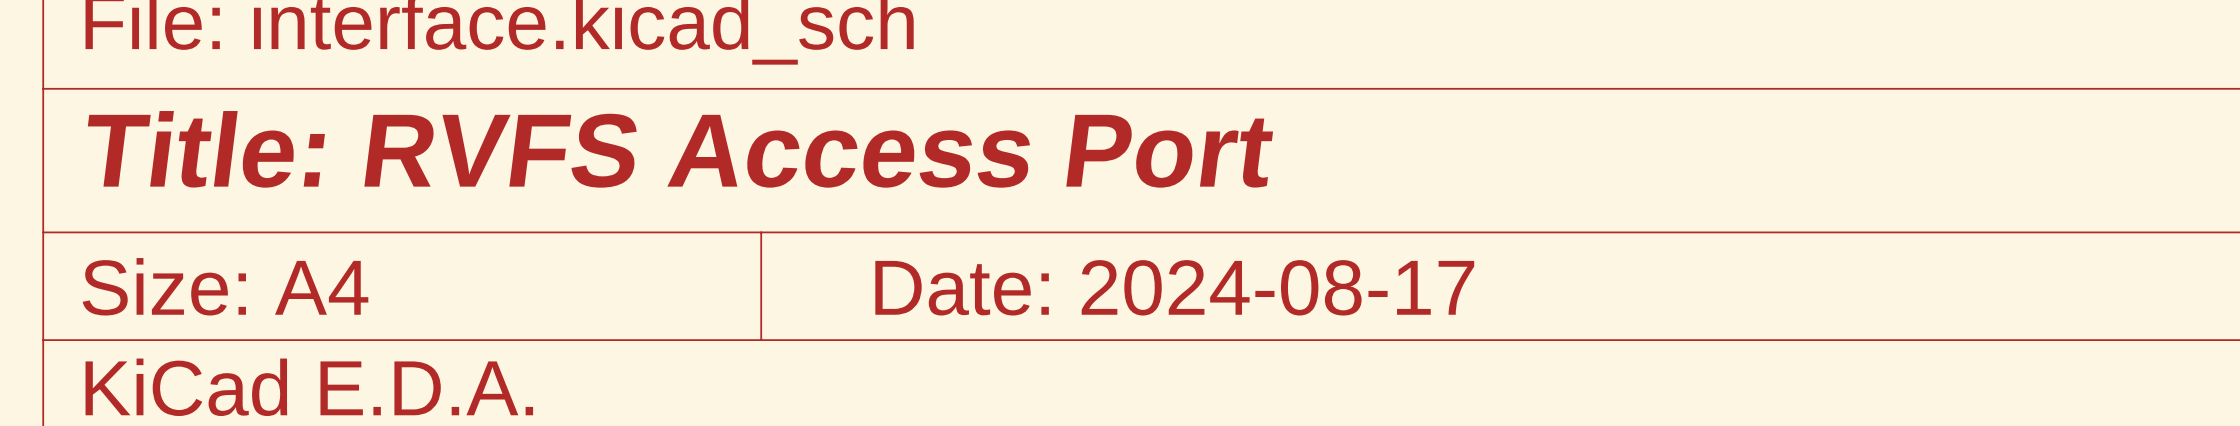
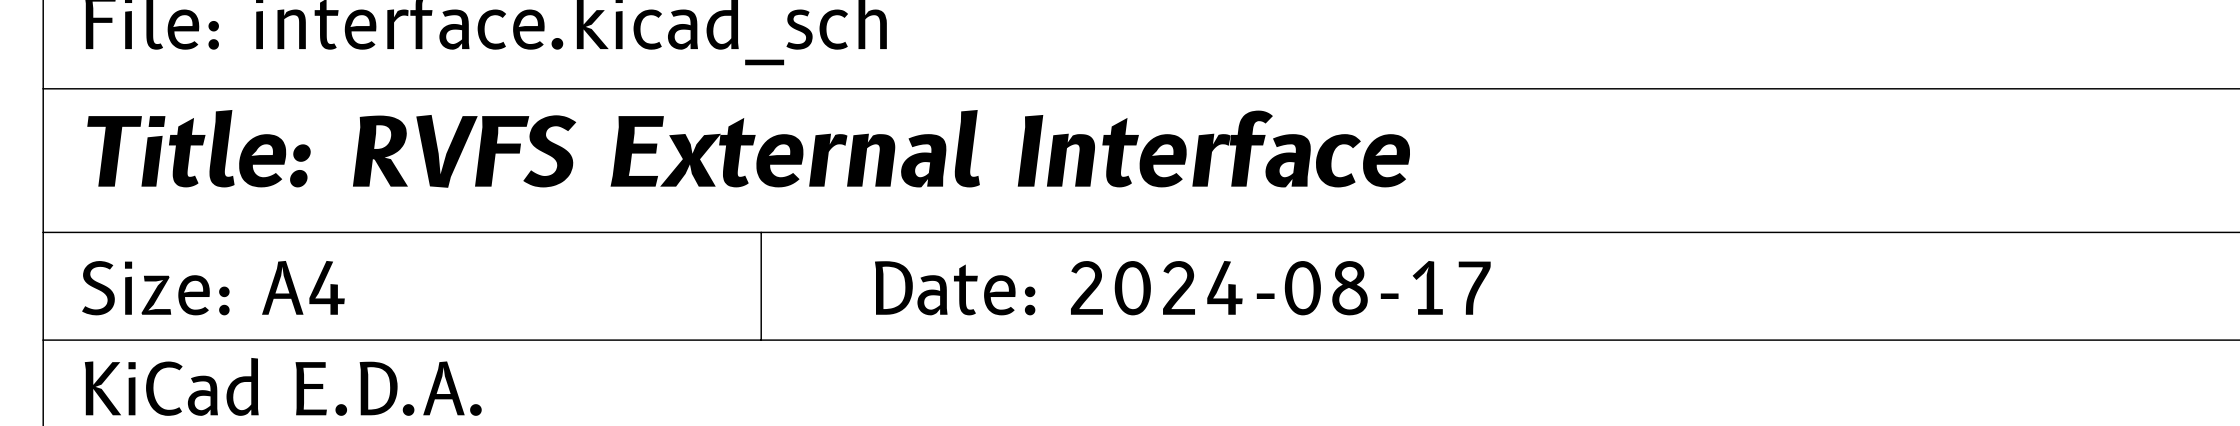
title block: Title: RVFS Access Port (680, 149) -> Title: RVFS External Interface (748, 148)

